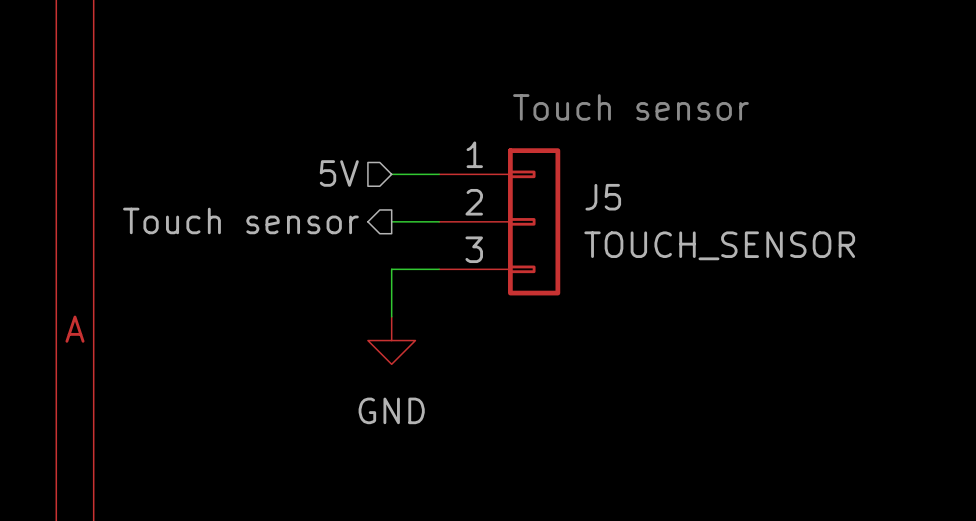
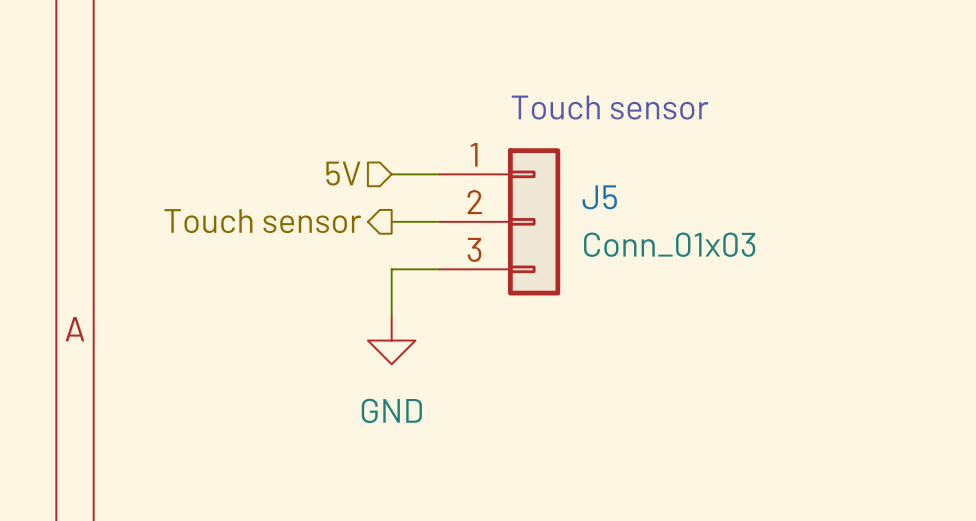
J5 value: TOUCH_SENSOR (719, 245) -> Conn_01x03 (669, 244)

